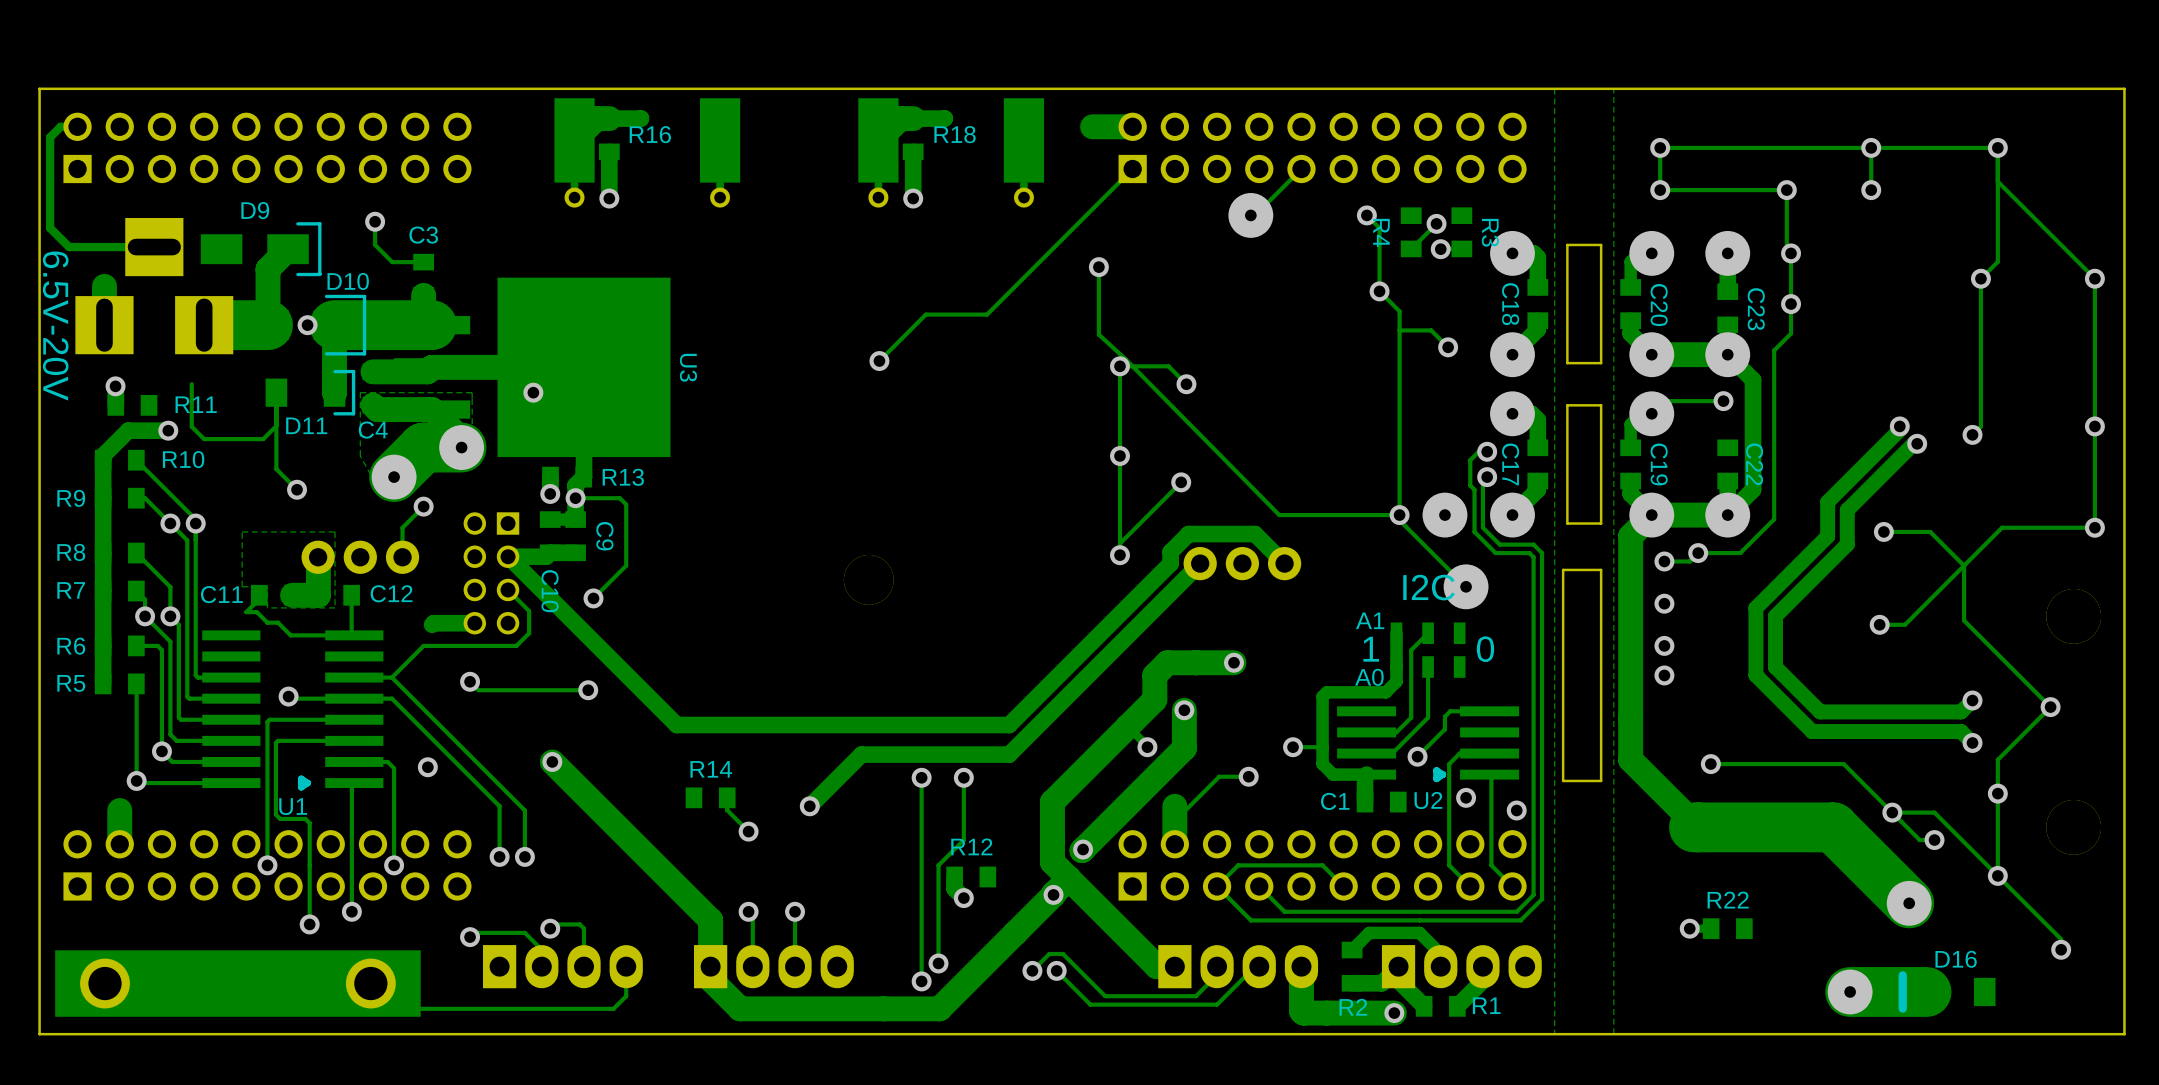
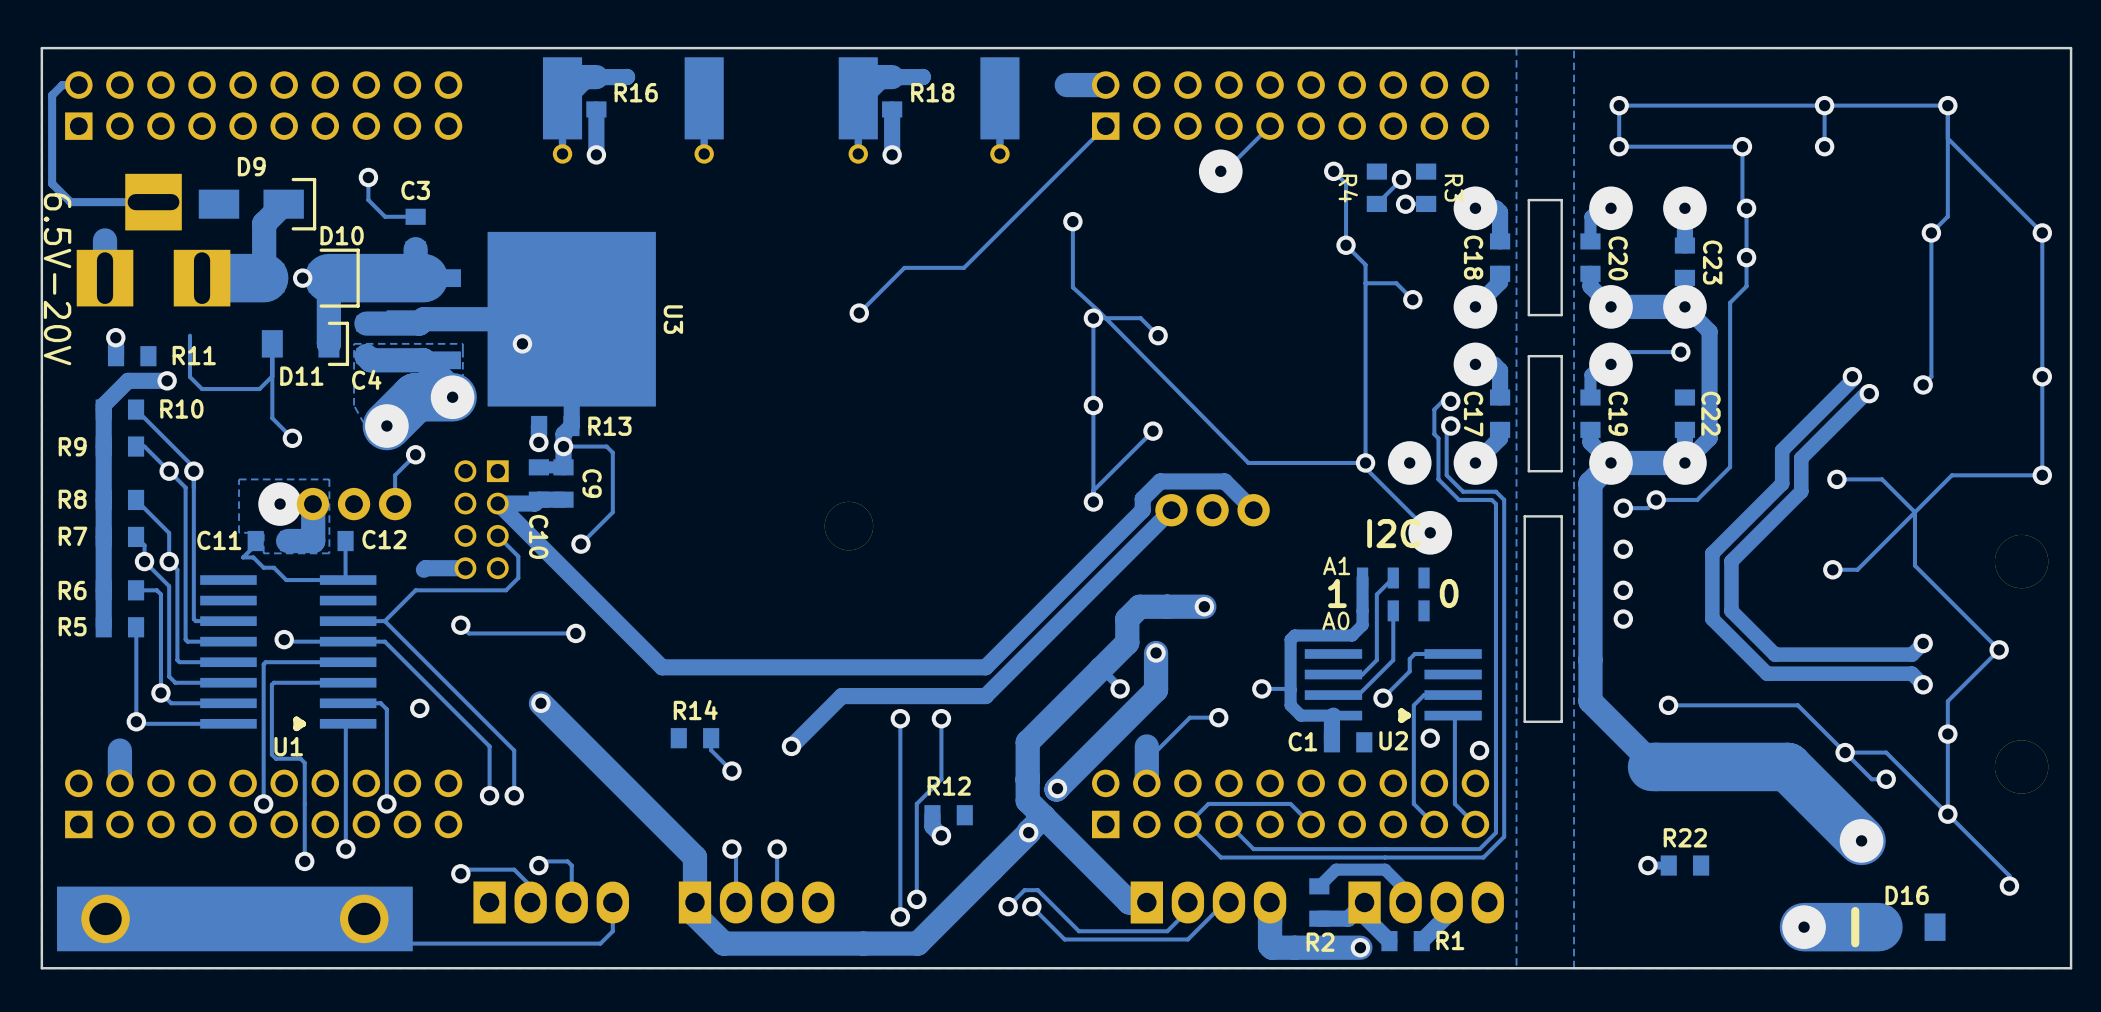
via: none -> (280, 504)

